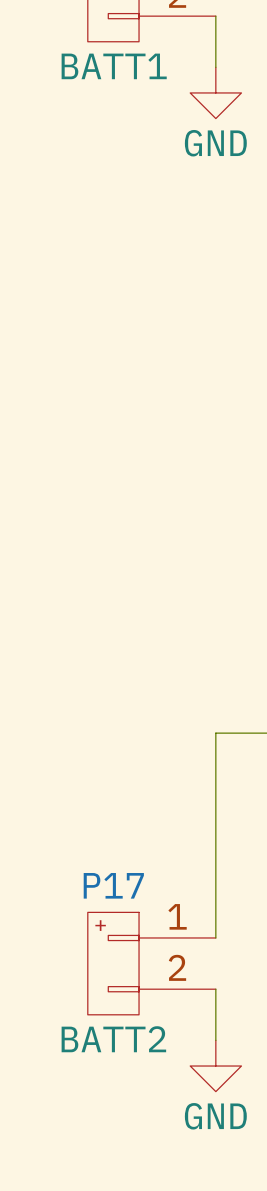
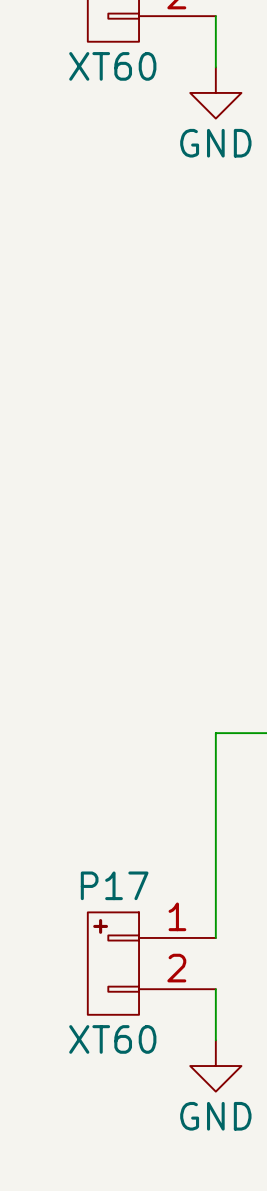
part value: BATT1 (114, 66) -> XT60 (112, 66)
P17 value: BATT2 (113, 1039) -> XT60 (112, 1039)

